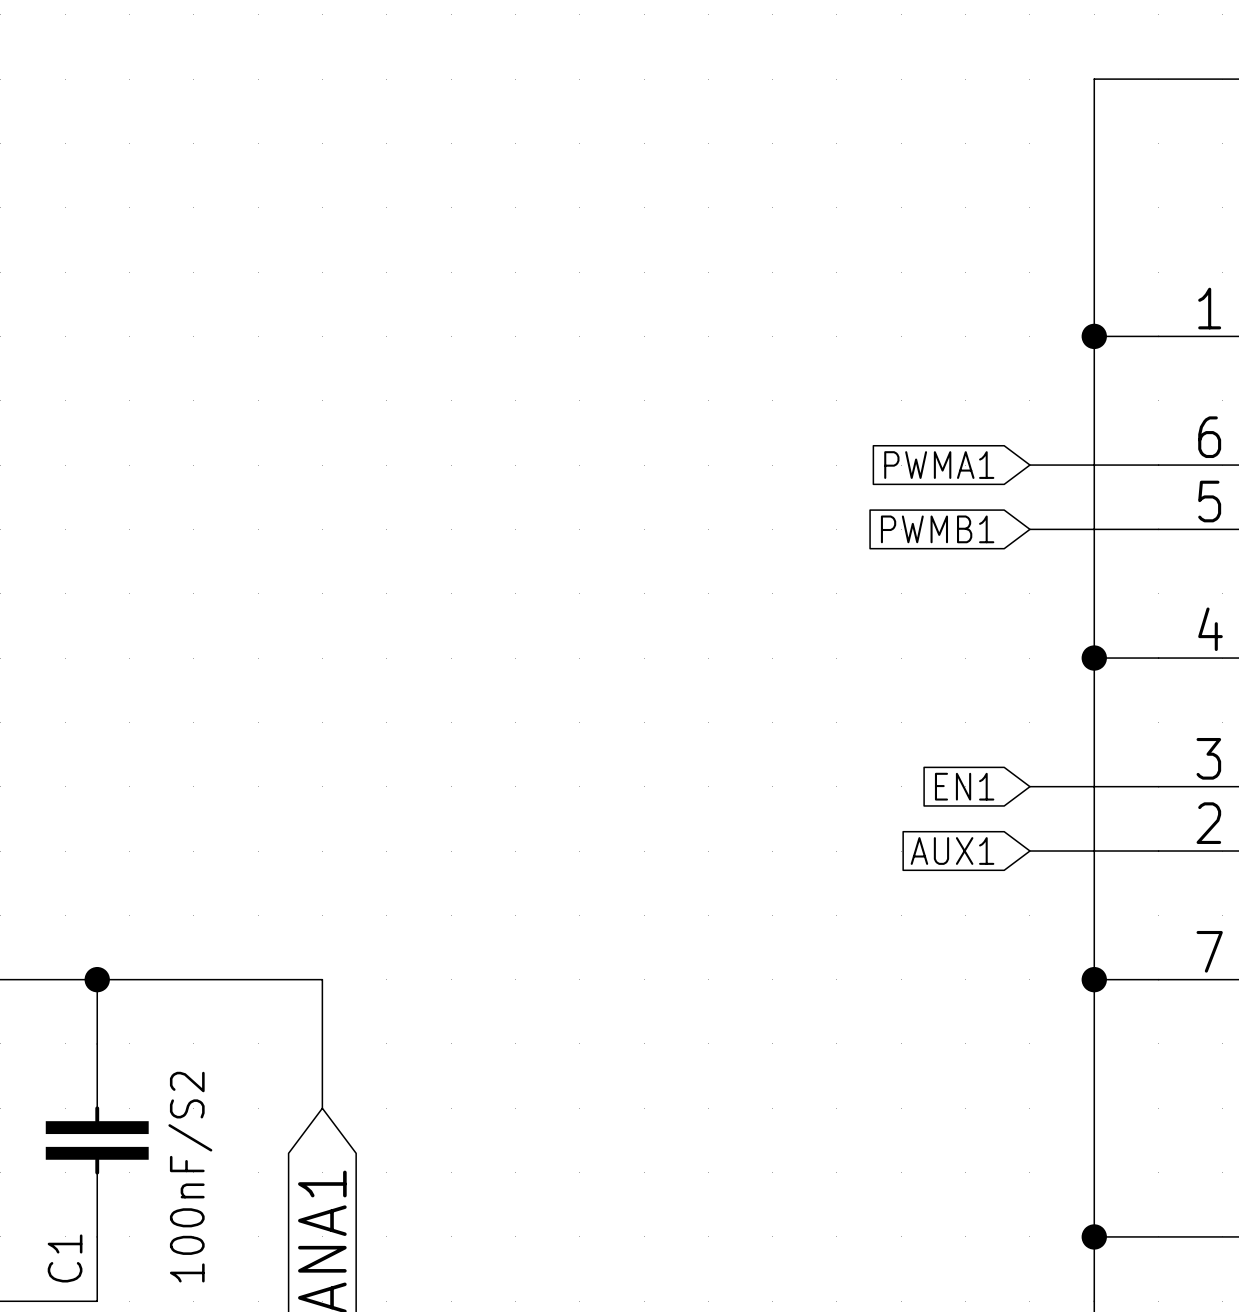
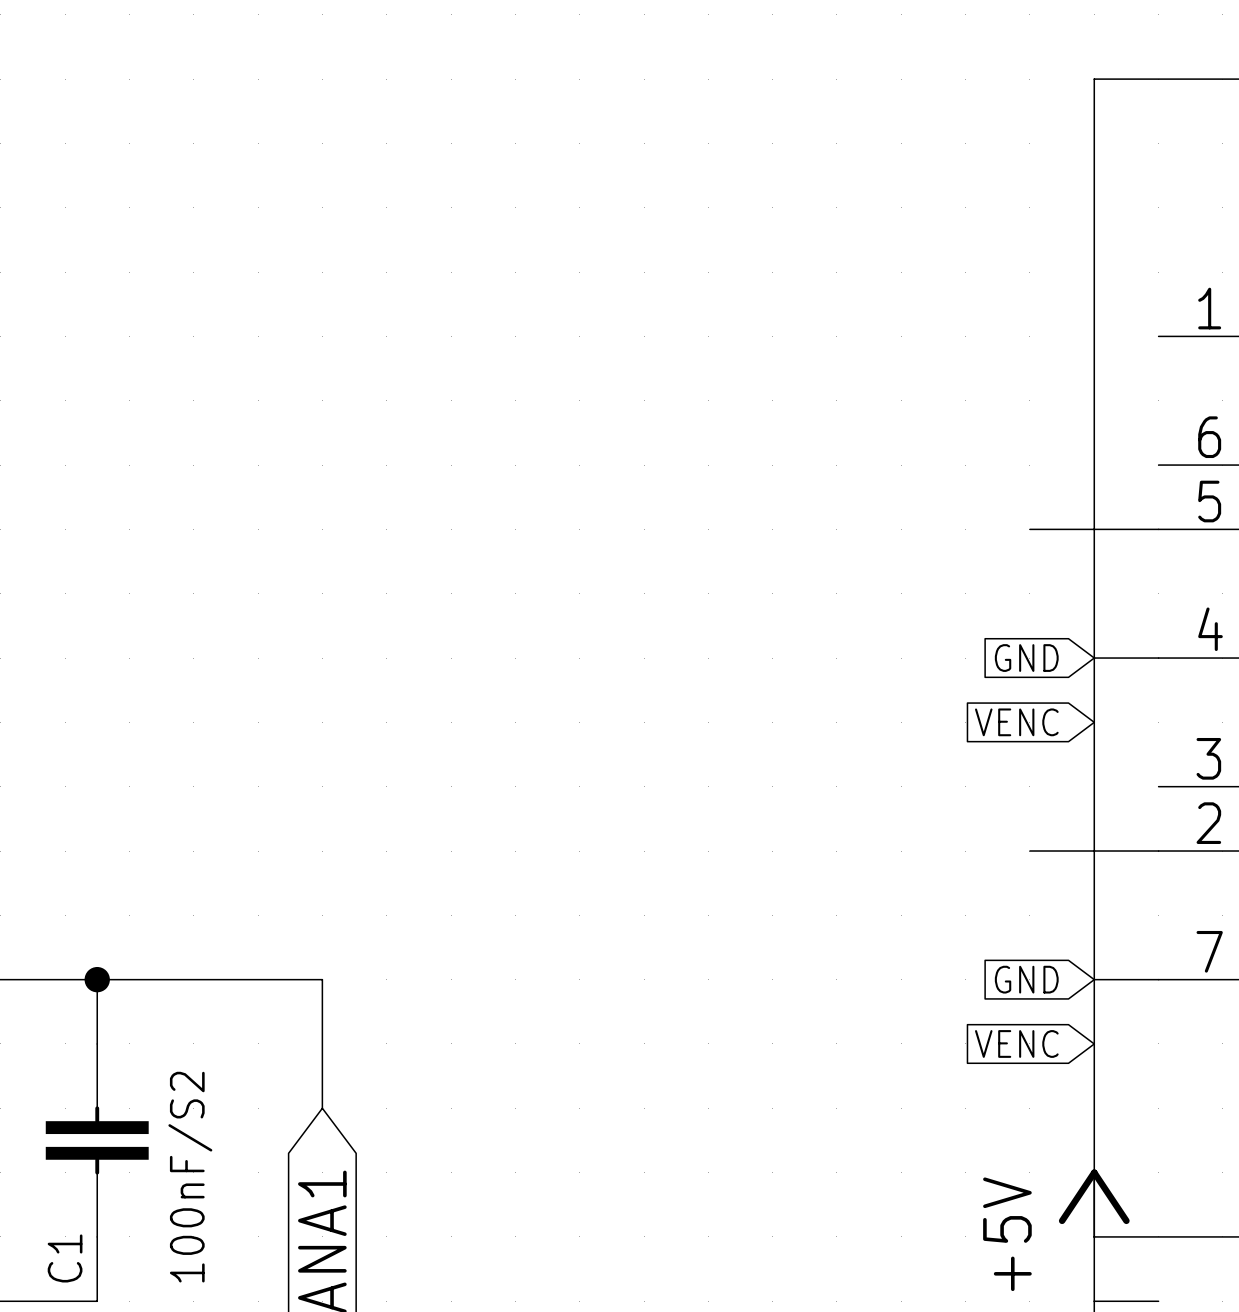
wire: (1094, 336) (1158, 336) -> none
junction: (1094, 336) -> none
global label: PWMA1 (939, 465) -> none
wire: (1029, 465) (1158, 465) -> none
global label: PWMB1 (937, 529) -> none
global label: none -> GND (1026, 658)
junction: (1094, 658) -> none
global label: none -> VENC (1016, 722)
global label: EN1 (964, 786) -> none
wire: (1029, 786) (1158, 786) -> none
global label: AUX1 (952, 851) -> none
global label: none -> GND (1026, 979)
junction: (1094, 979) -> none
global label: none -> VENC (1016, 1043)
power symbol: none -> +5V (1094, 1203)
junction: (1094, 1236) -> none
wire: none -> (1094, 1301) (1158, 1301)

